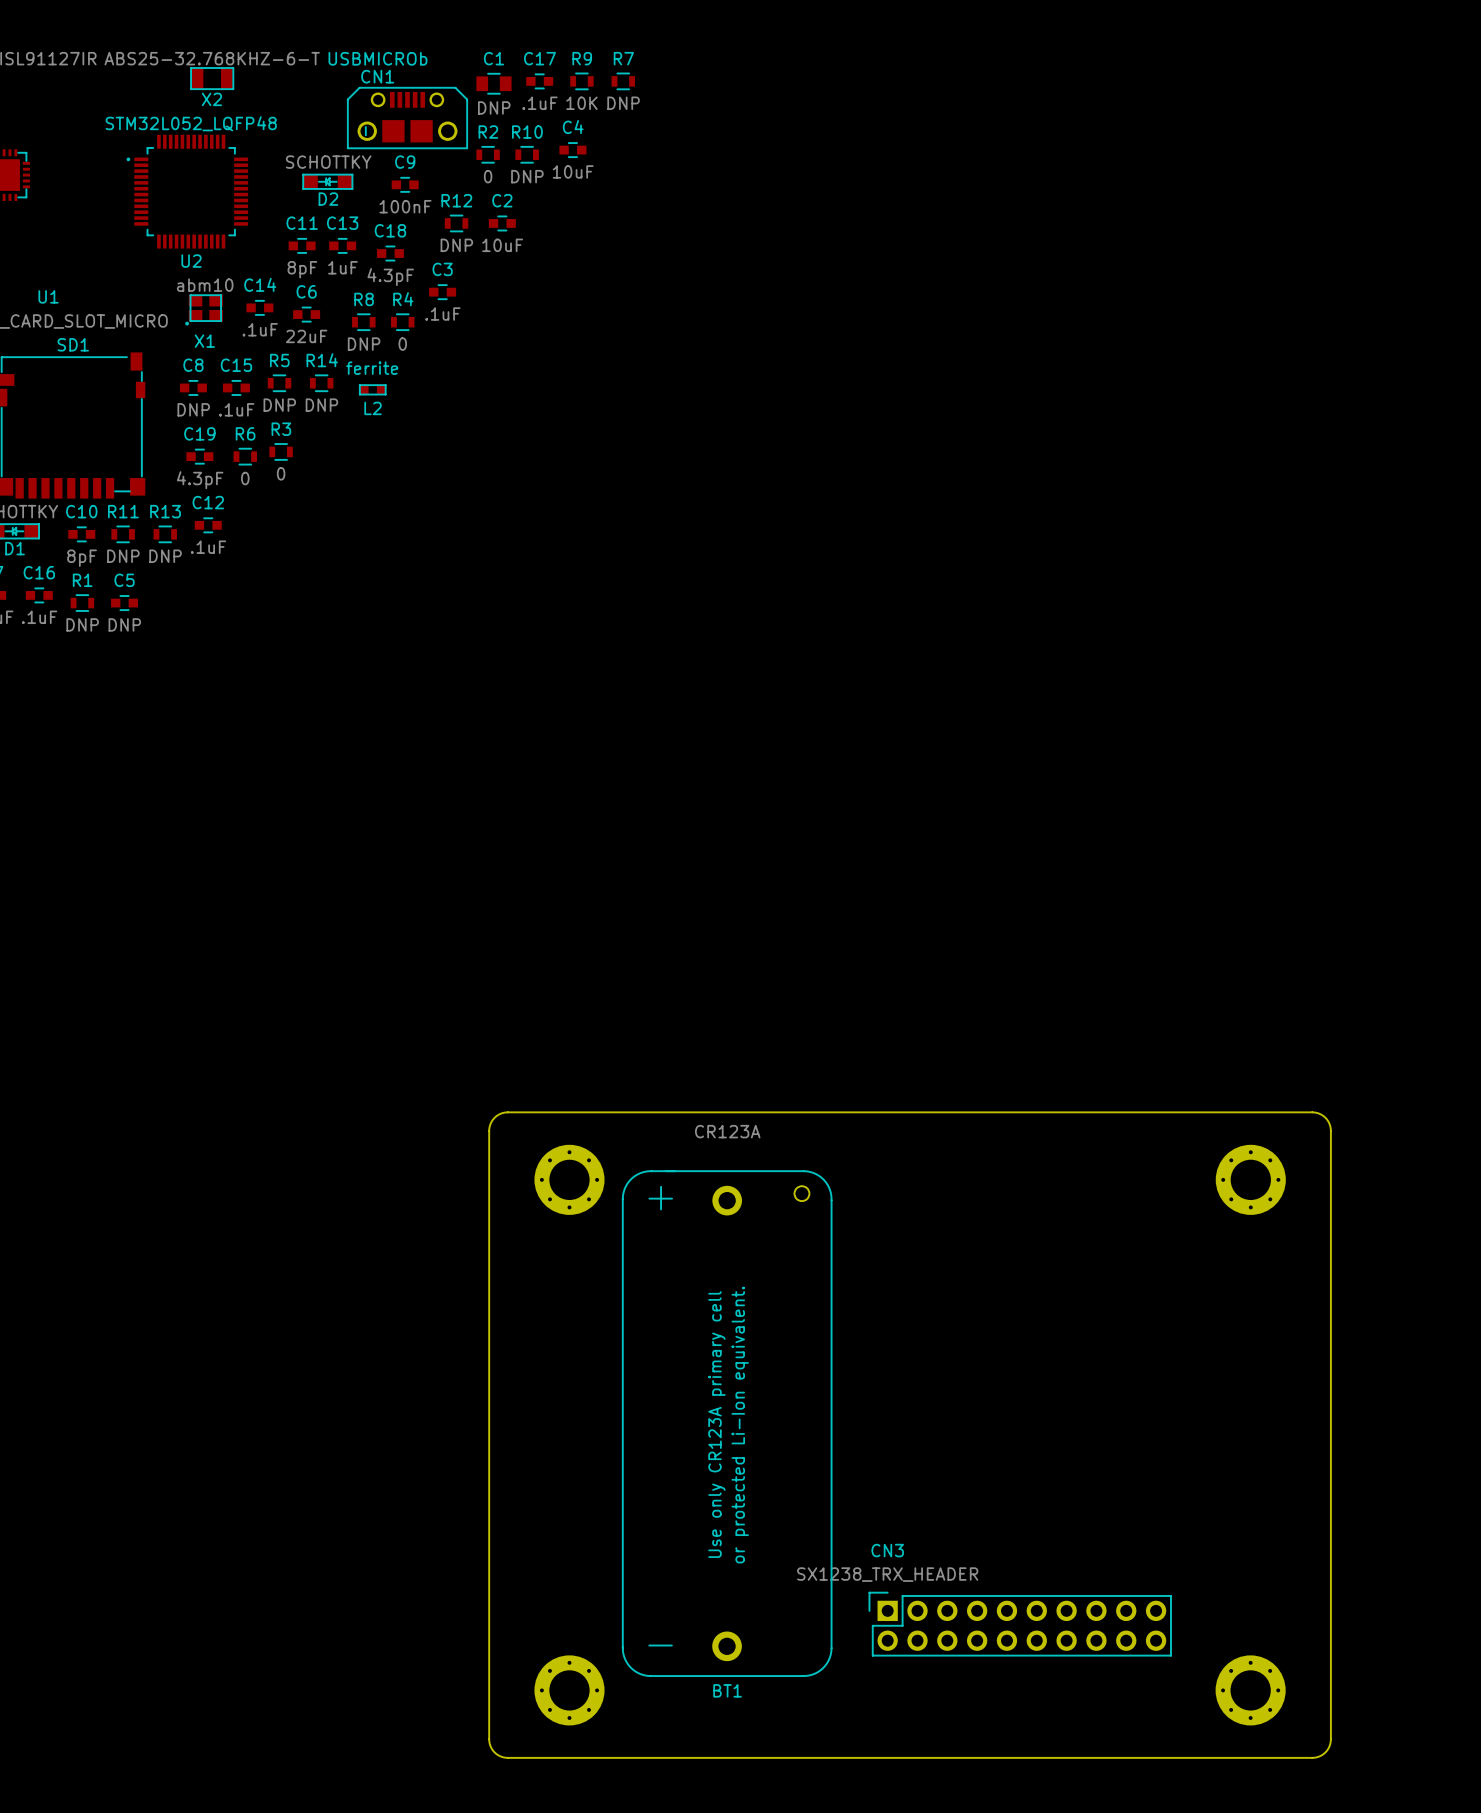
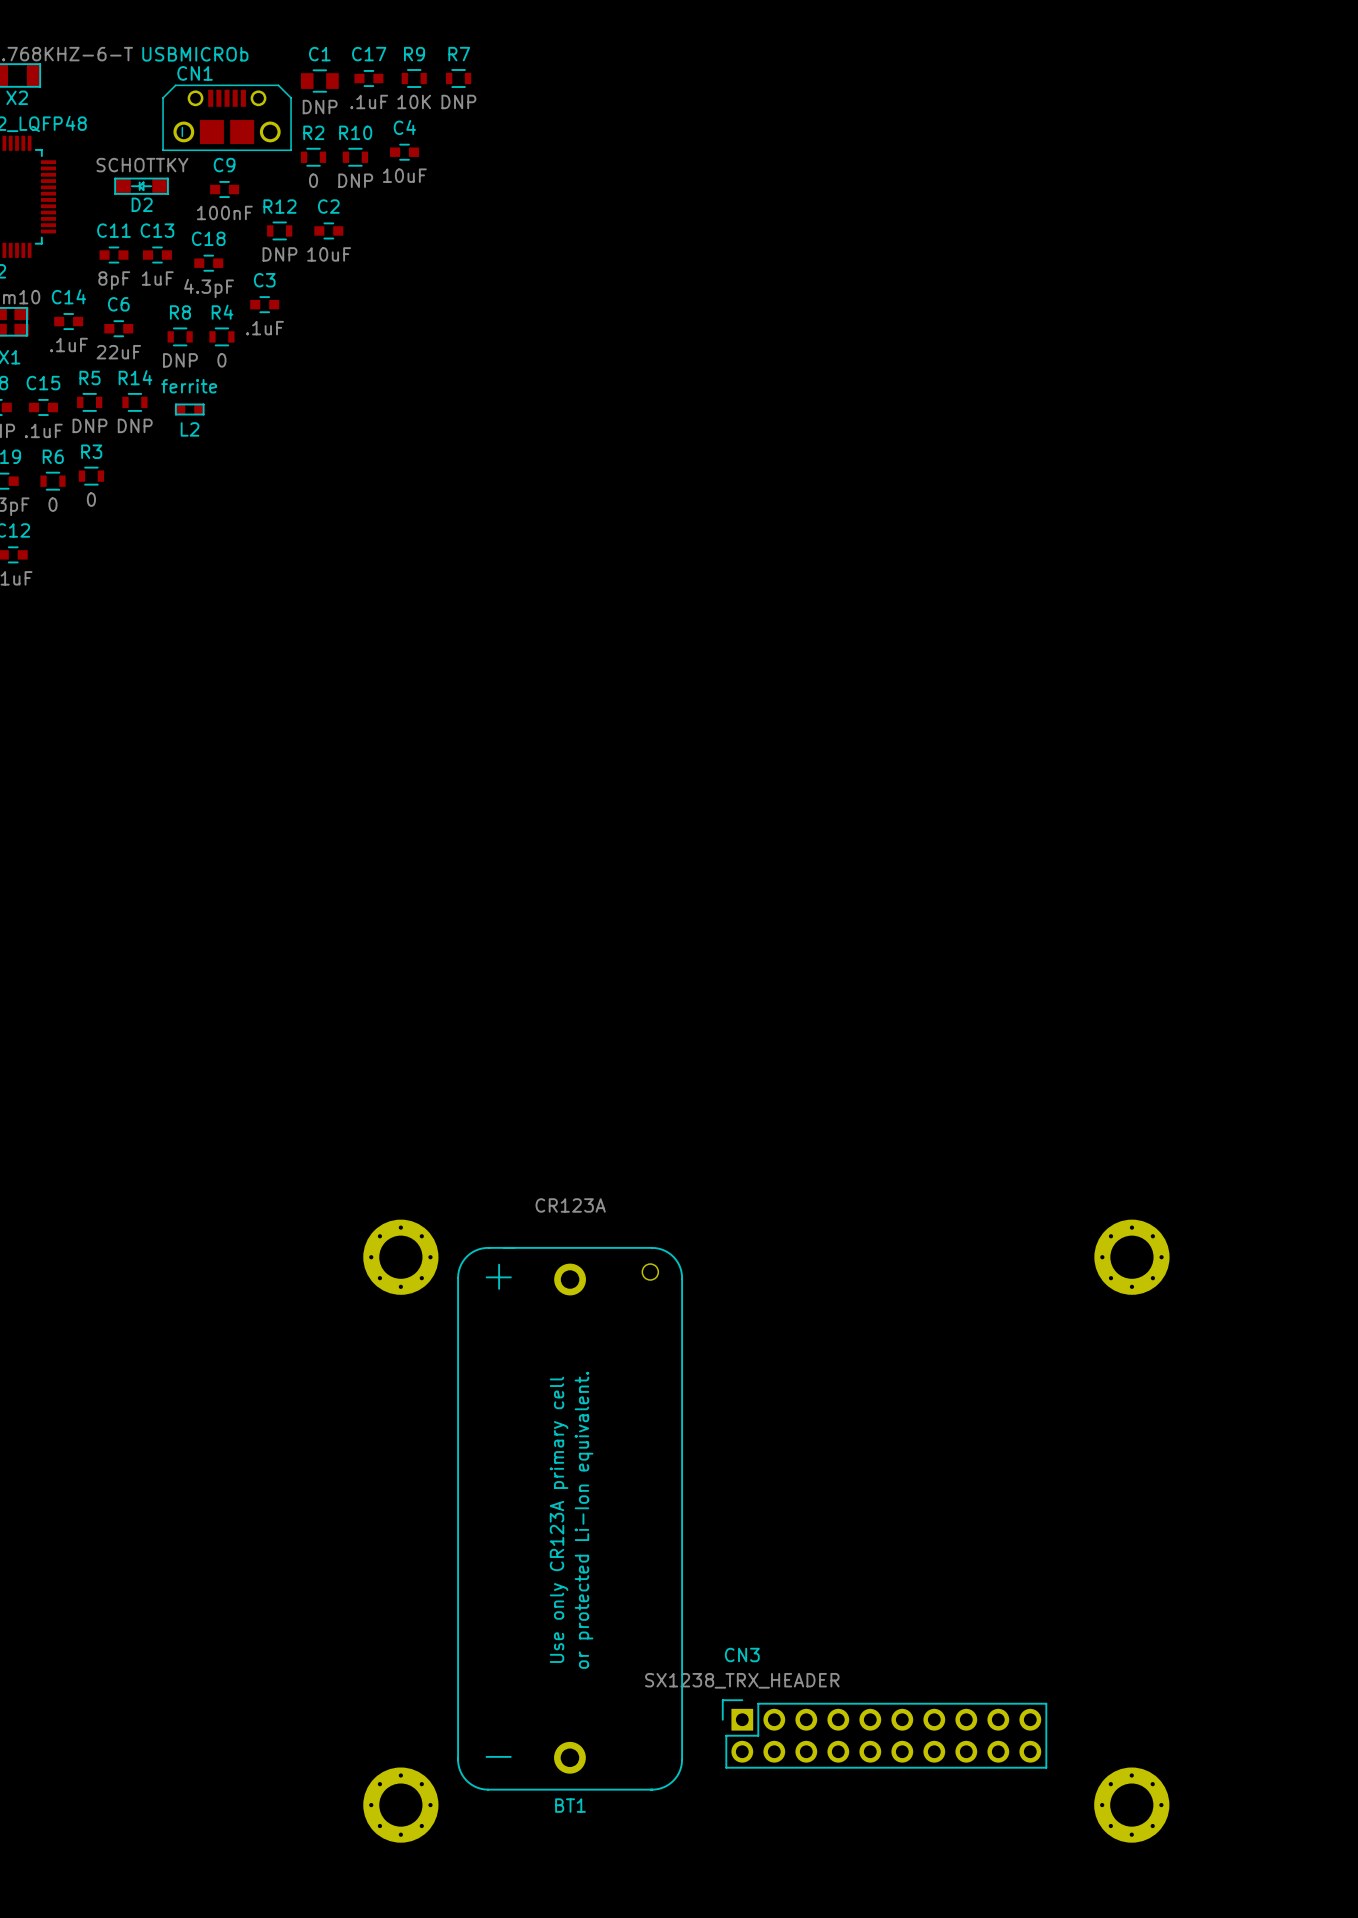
board edge: (1312, 1112) (507, 1112) (494, 1117) (489, 1130) -> none
board edge: (1312, 1112) (1325, 1117) (1330, 1130) (1330, 1739) (1329, 1746) (1323, 1754) (1312, 1757) (507, 1757) -> none
board edge: (489, 1131) (489, 1739) (494, 1752) (507, 1757) -> none

